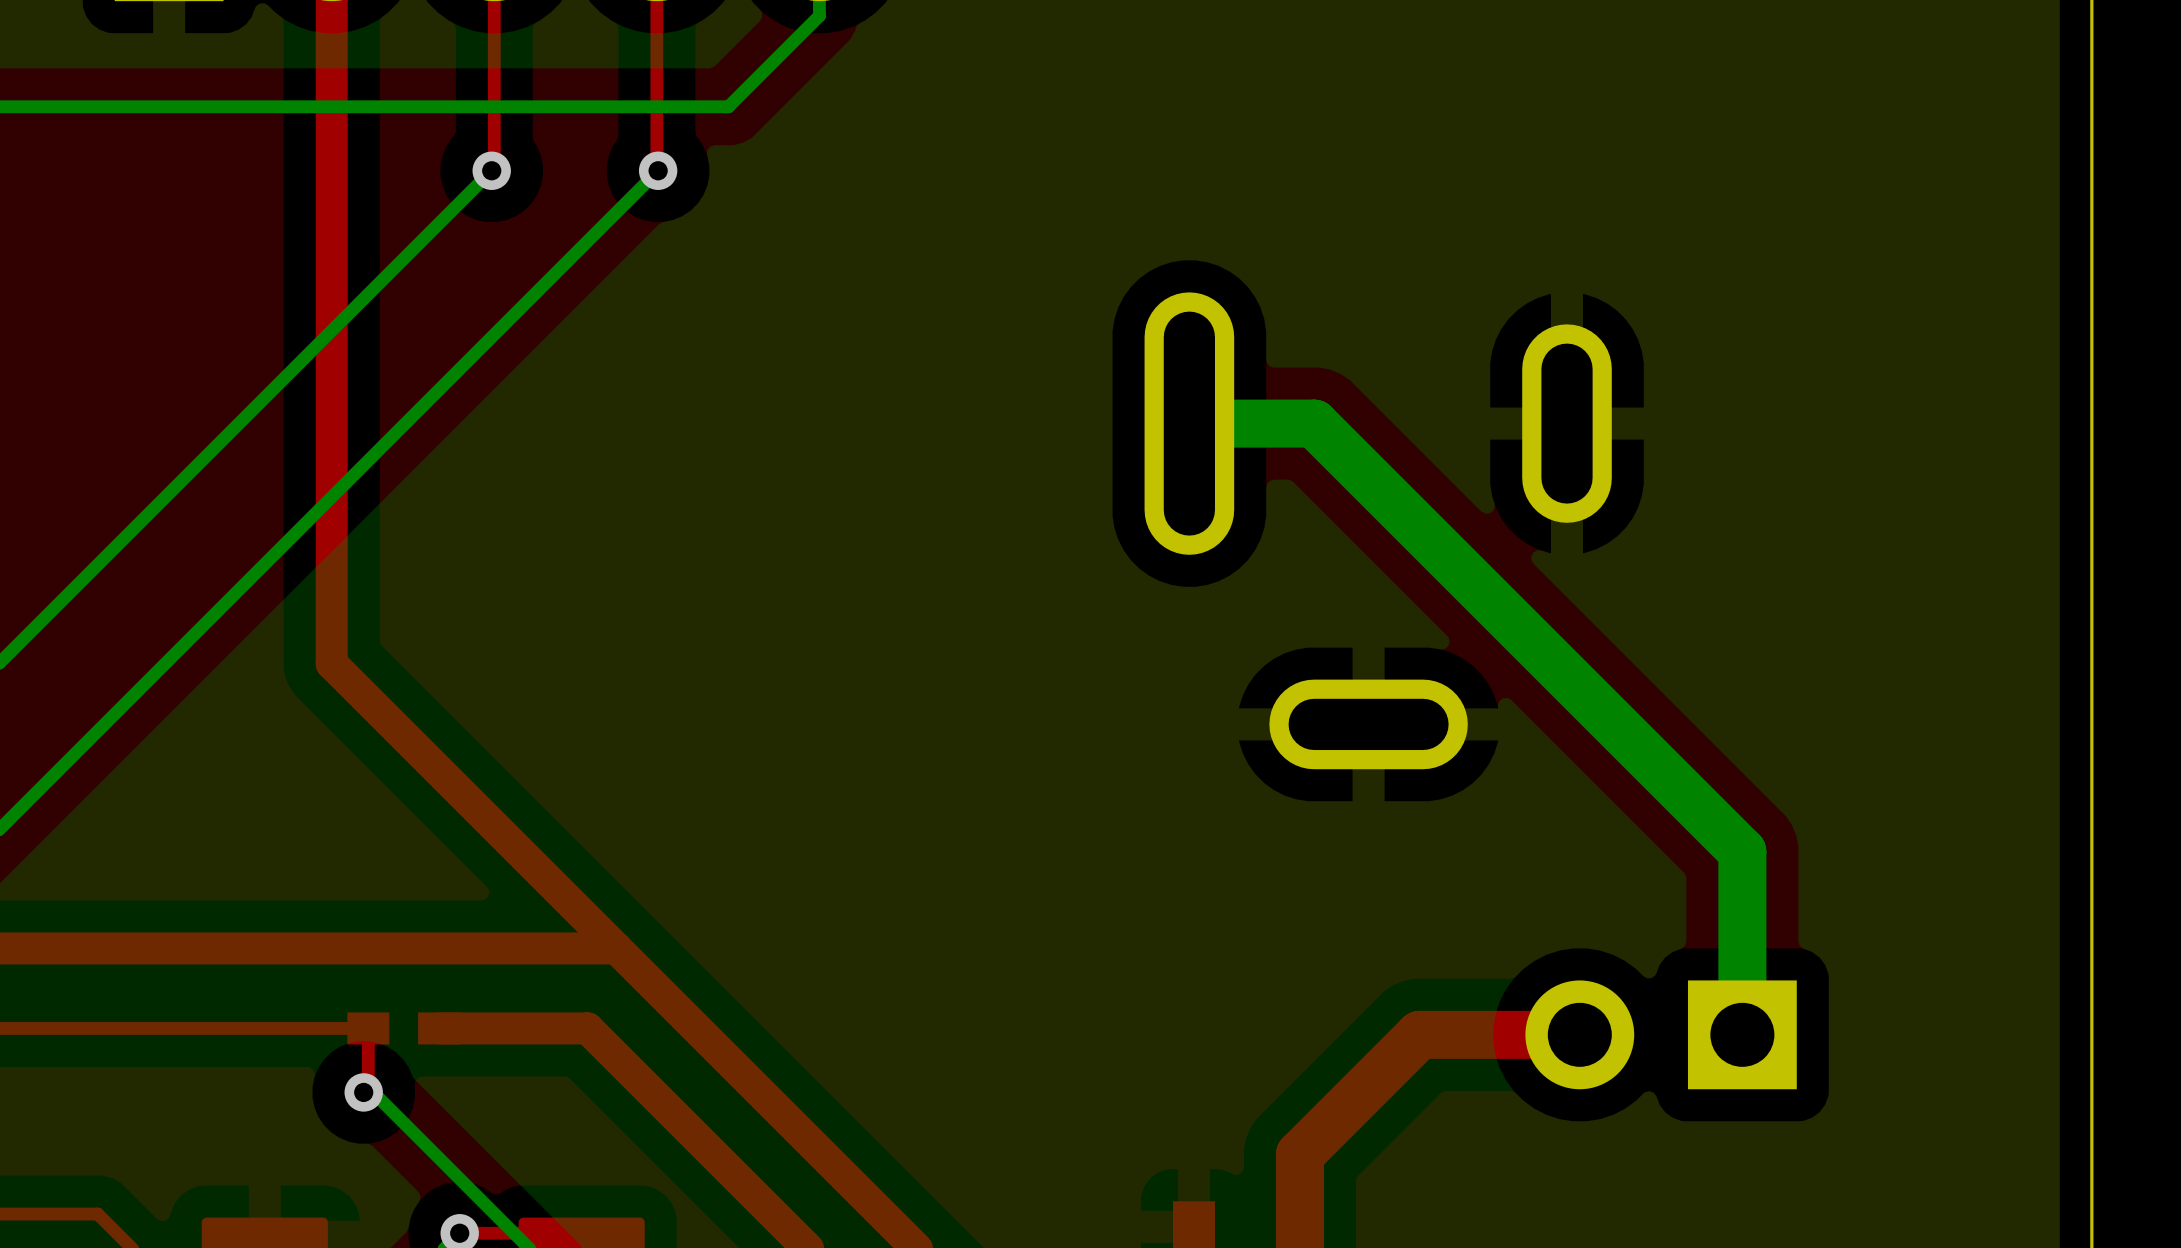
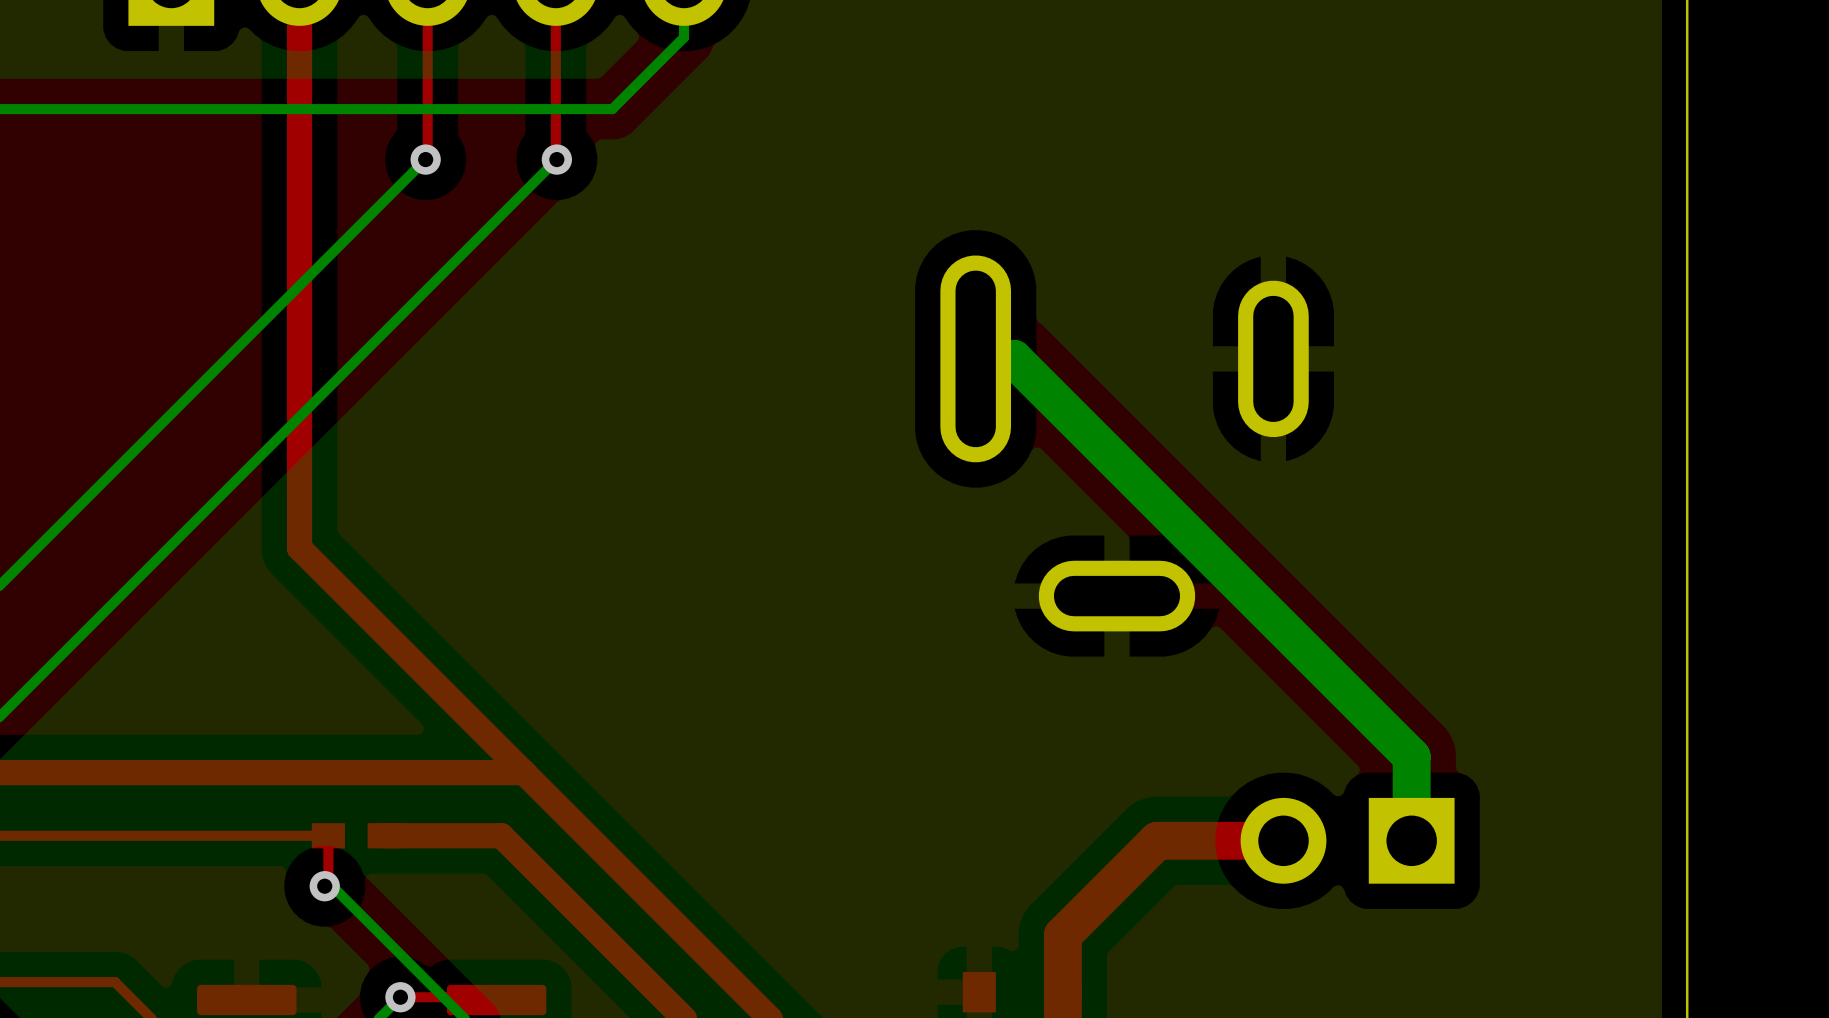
bottom track: (1237, 423) (1314, 423) (1742, 851) (1742, 928) -> (1013, 358) (1411, 756)

